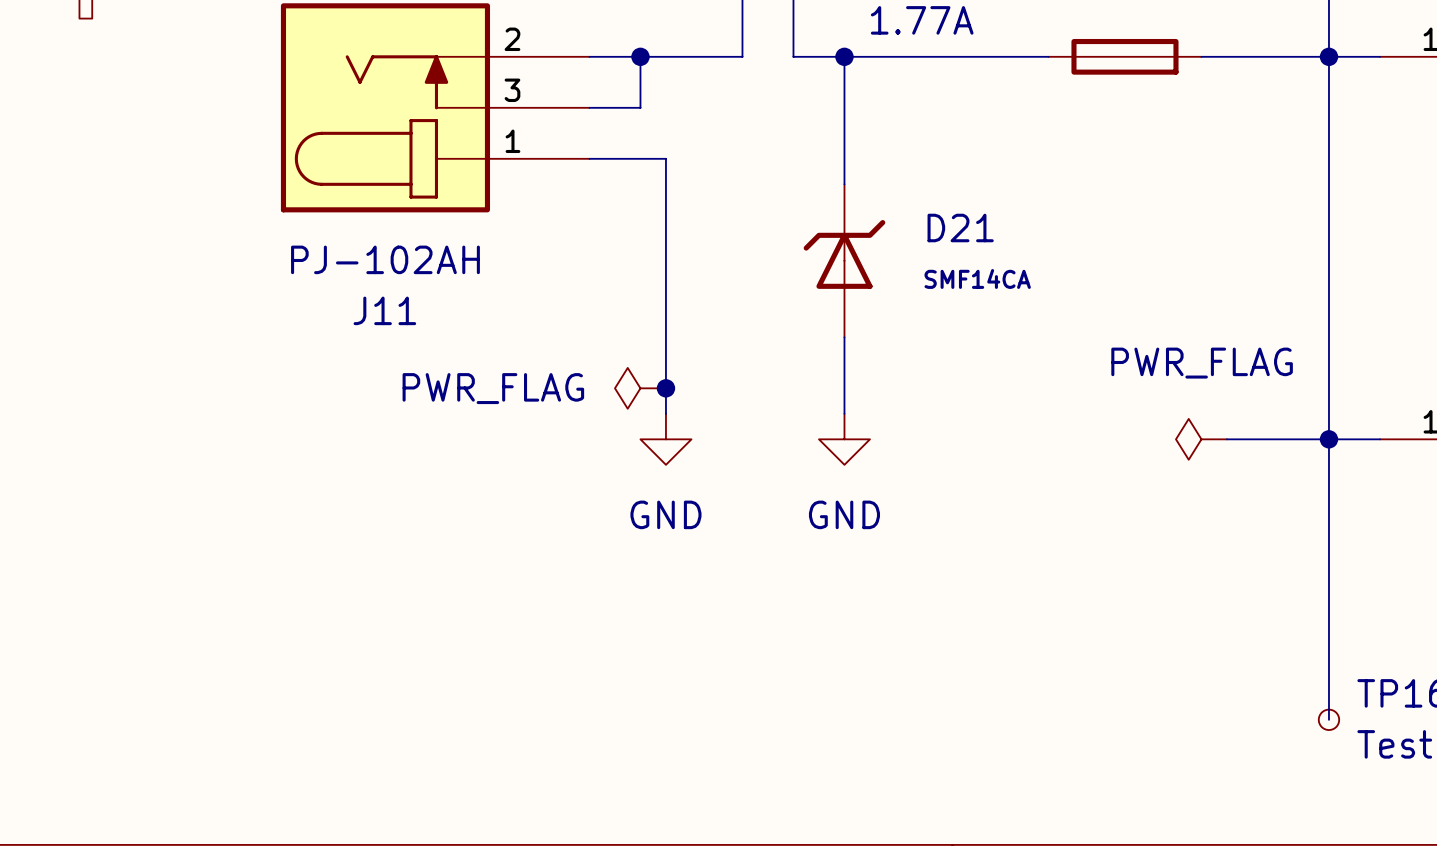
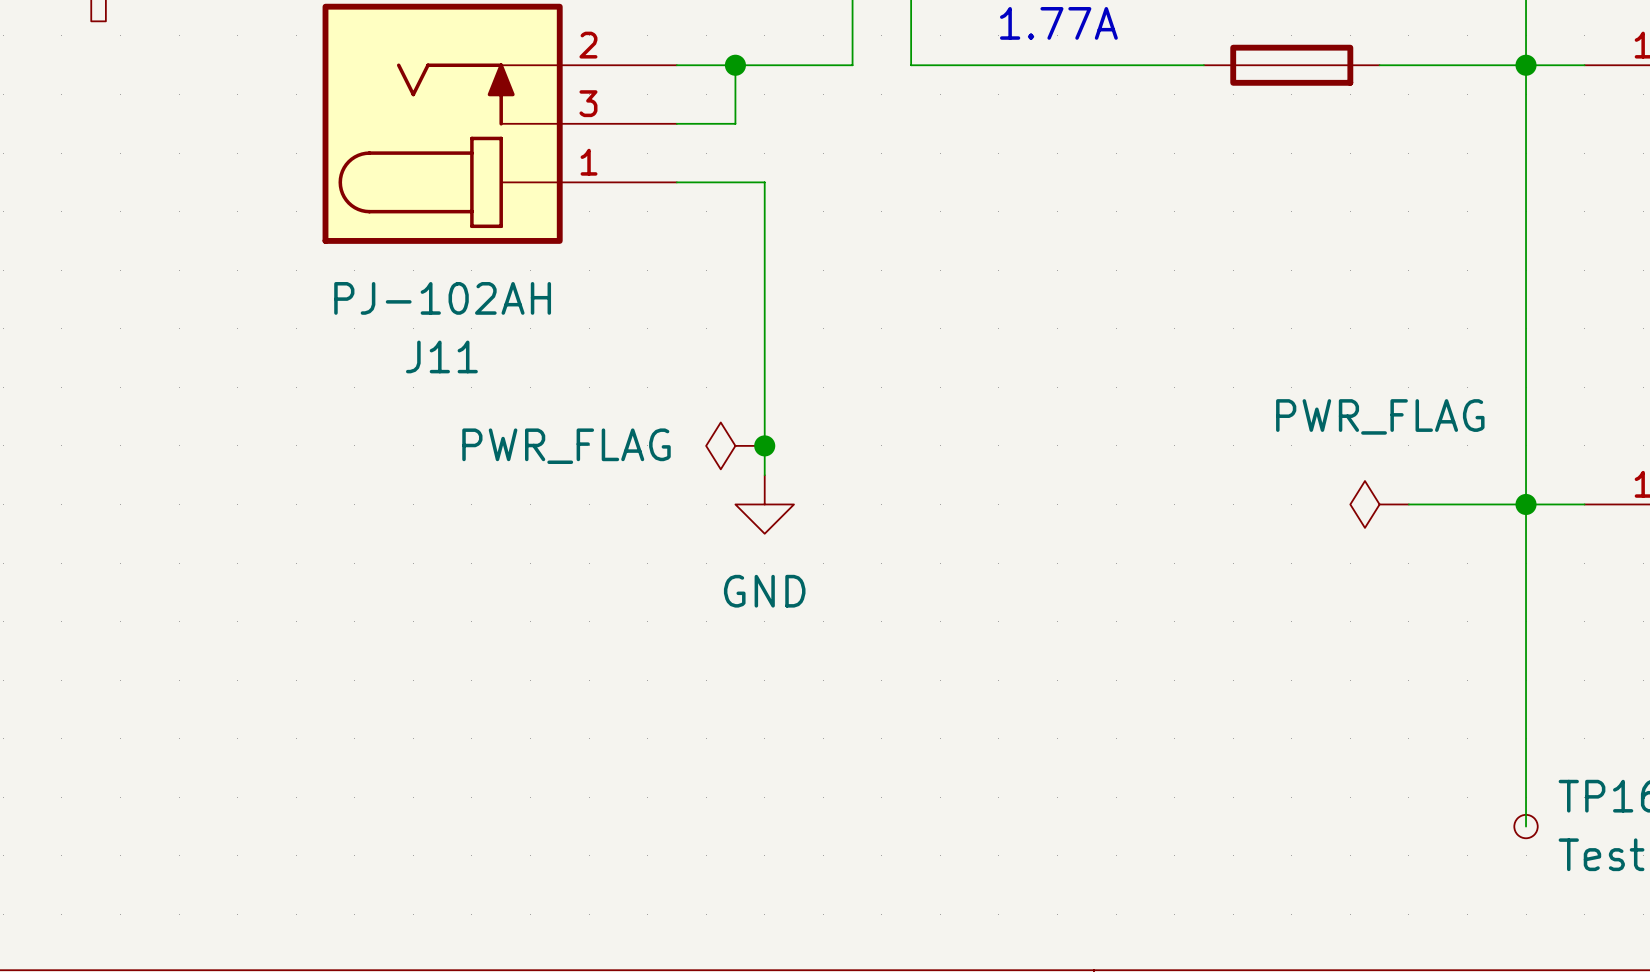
wire: (844, 56) (844, 184) -> none
junction: (844, 56) -> none
D21: SMF14CA (844, 260) -> none
wire: (844, 337) (844, 413) -> none
power symbol: GND (844, 439) -> none

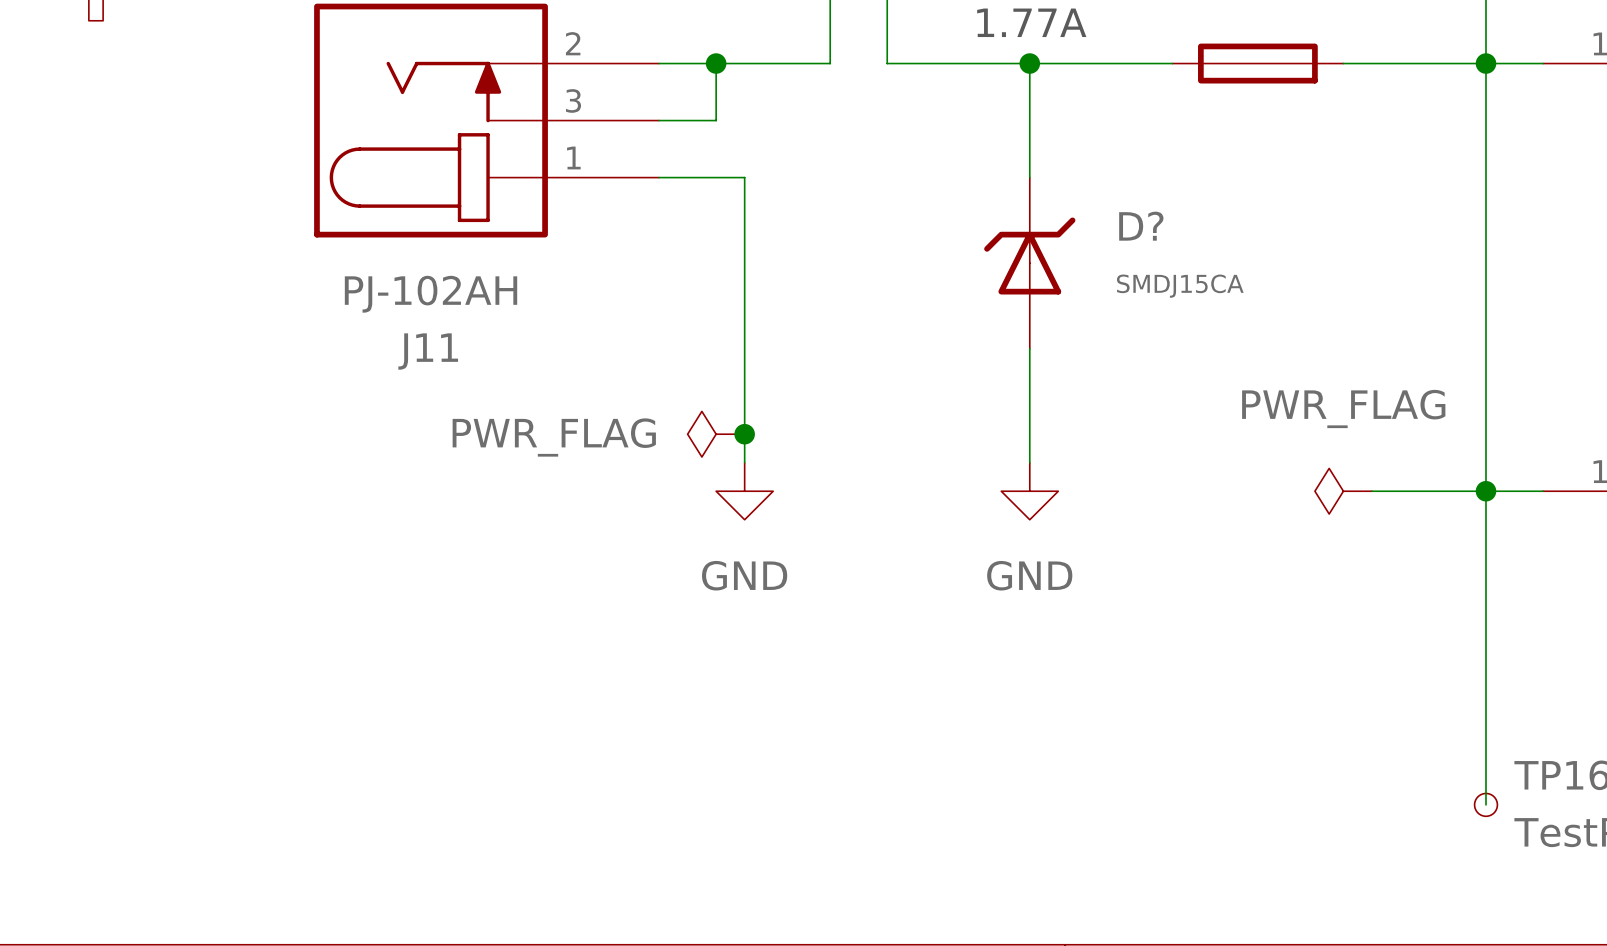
wire: none -> (1029, 63) (1029, 177)
junction: none -> (1029, 63)
D?: none -> SMDJ15CA (1029, 263)
wire: none -> (1029, 348) (1029, 462)
power symbol: none -> GND (1029, 491)

